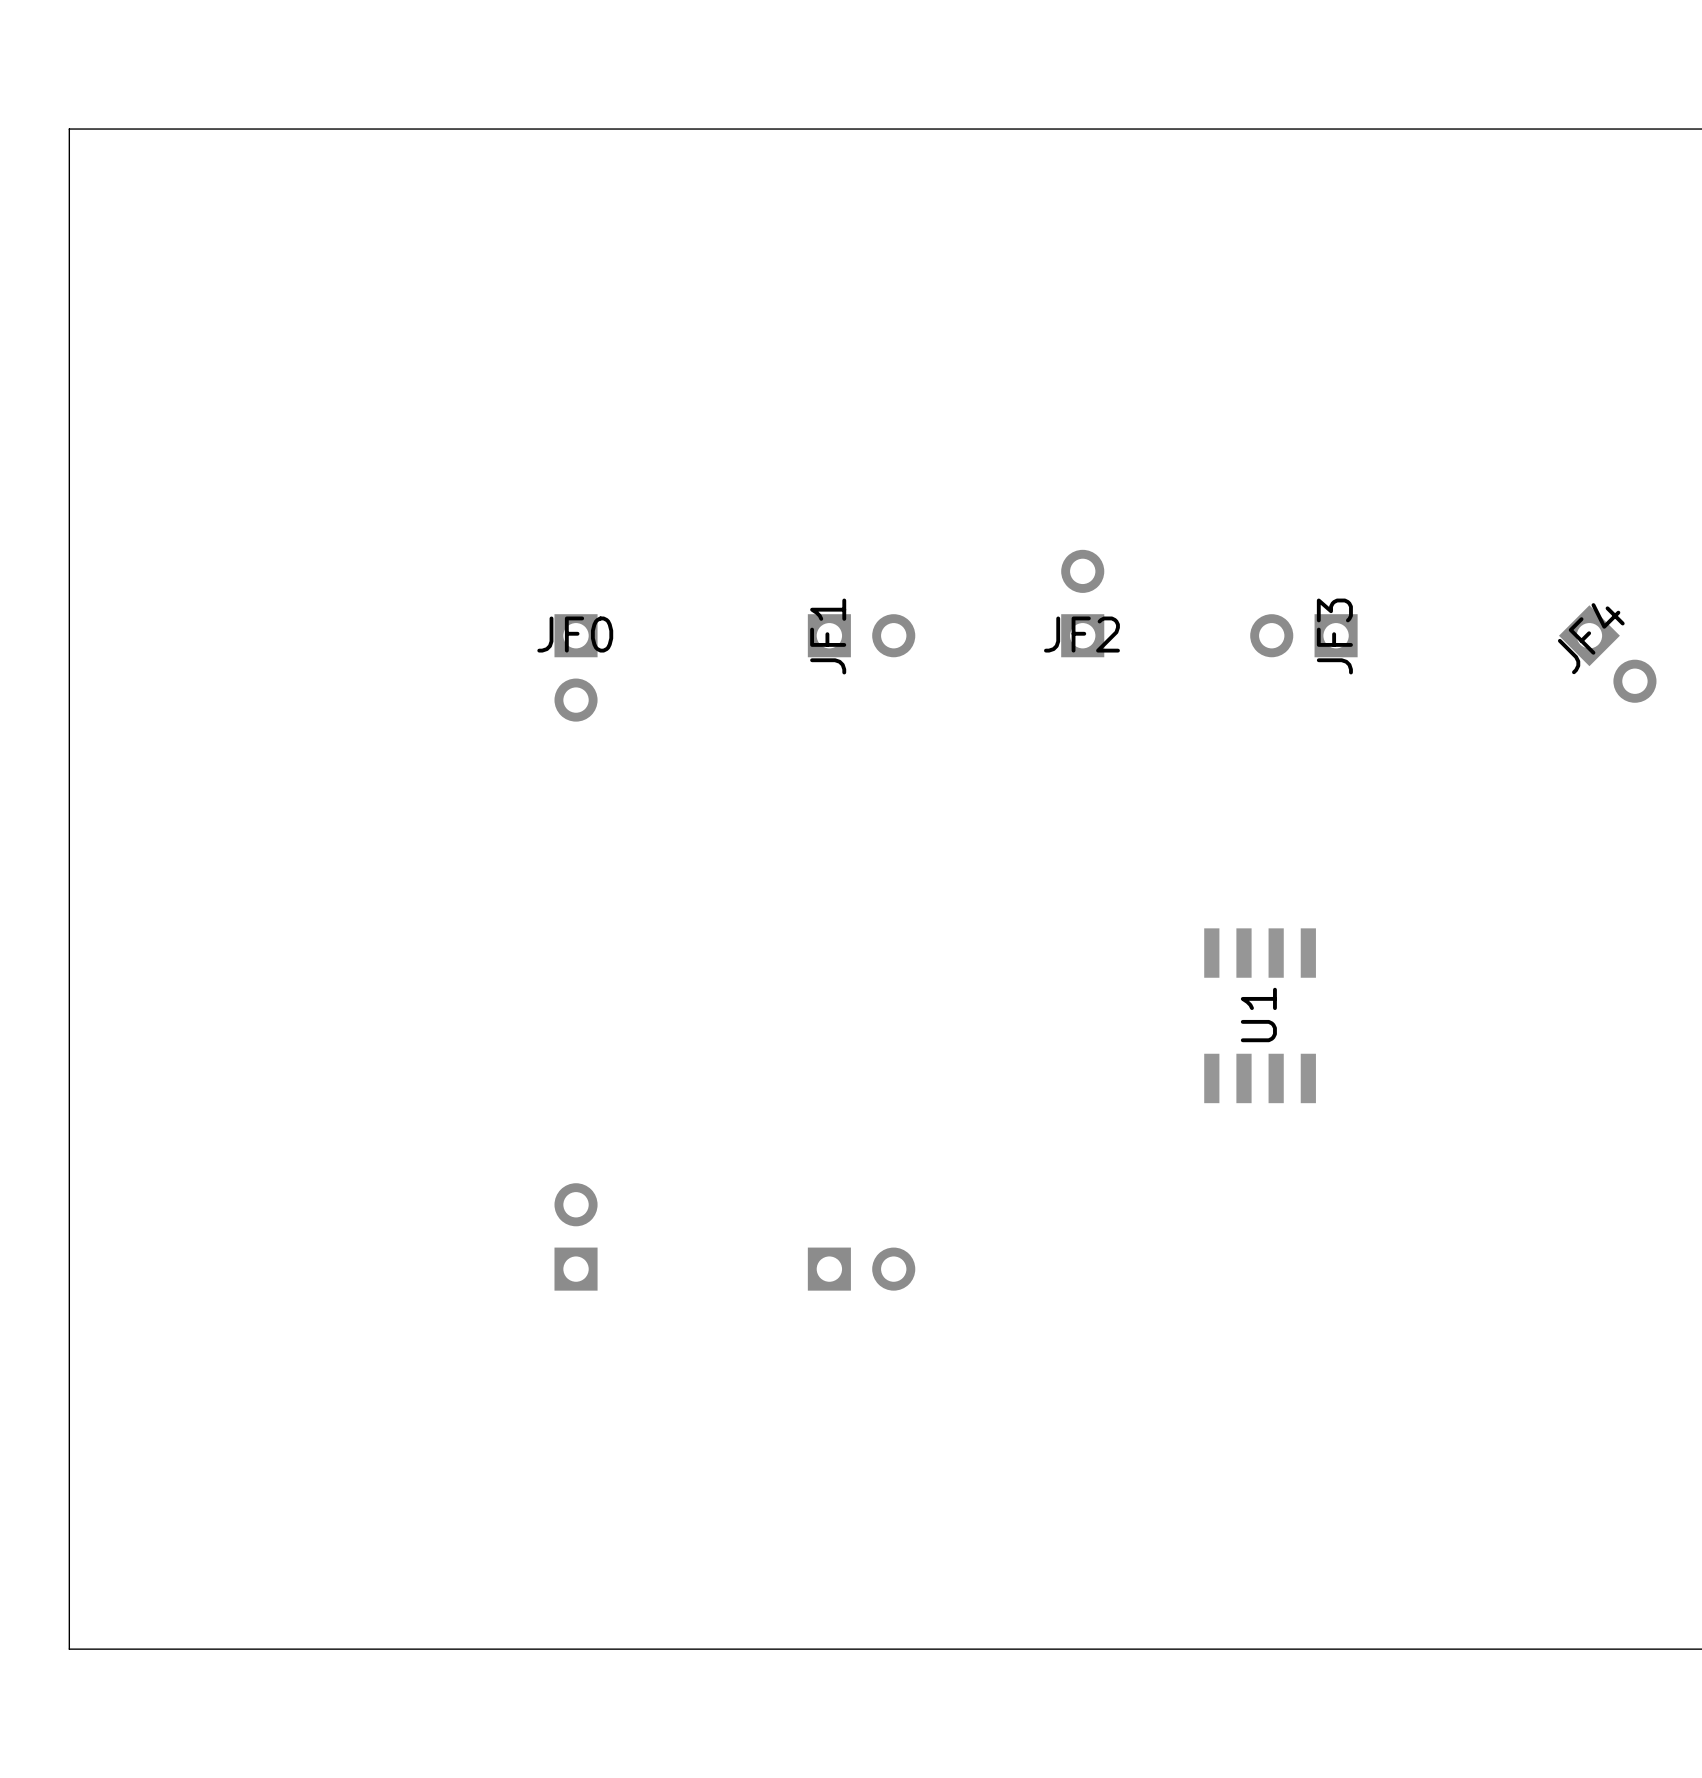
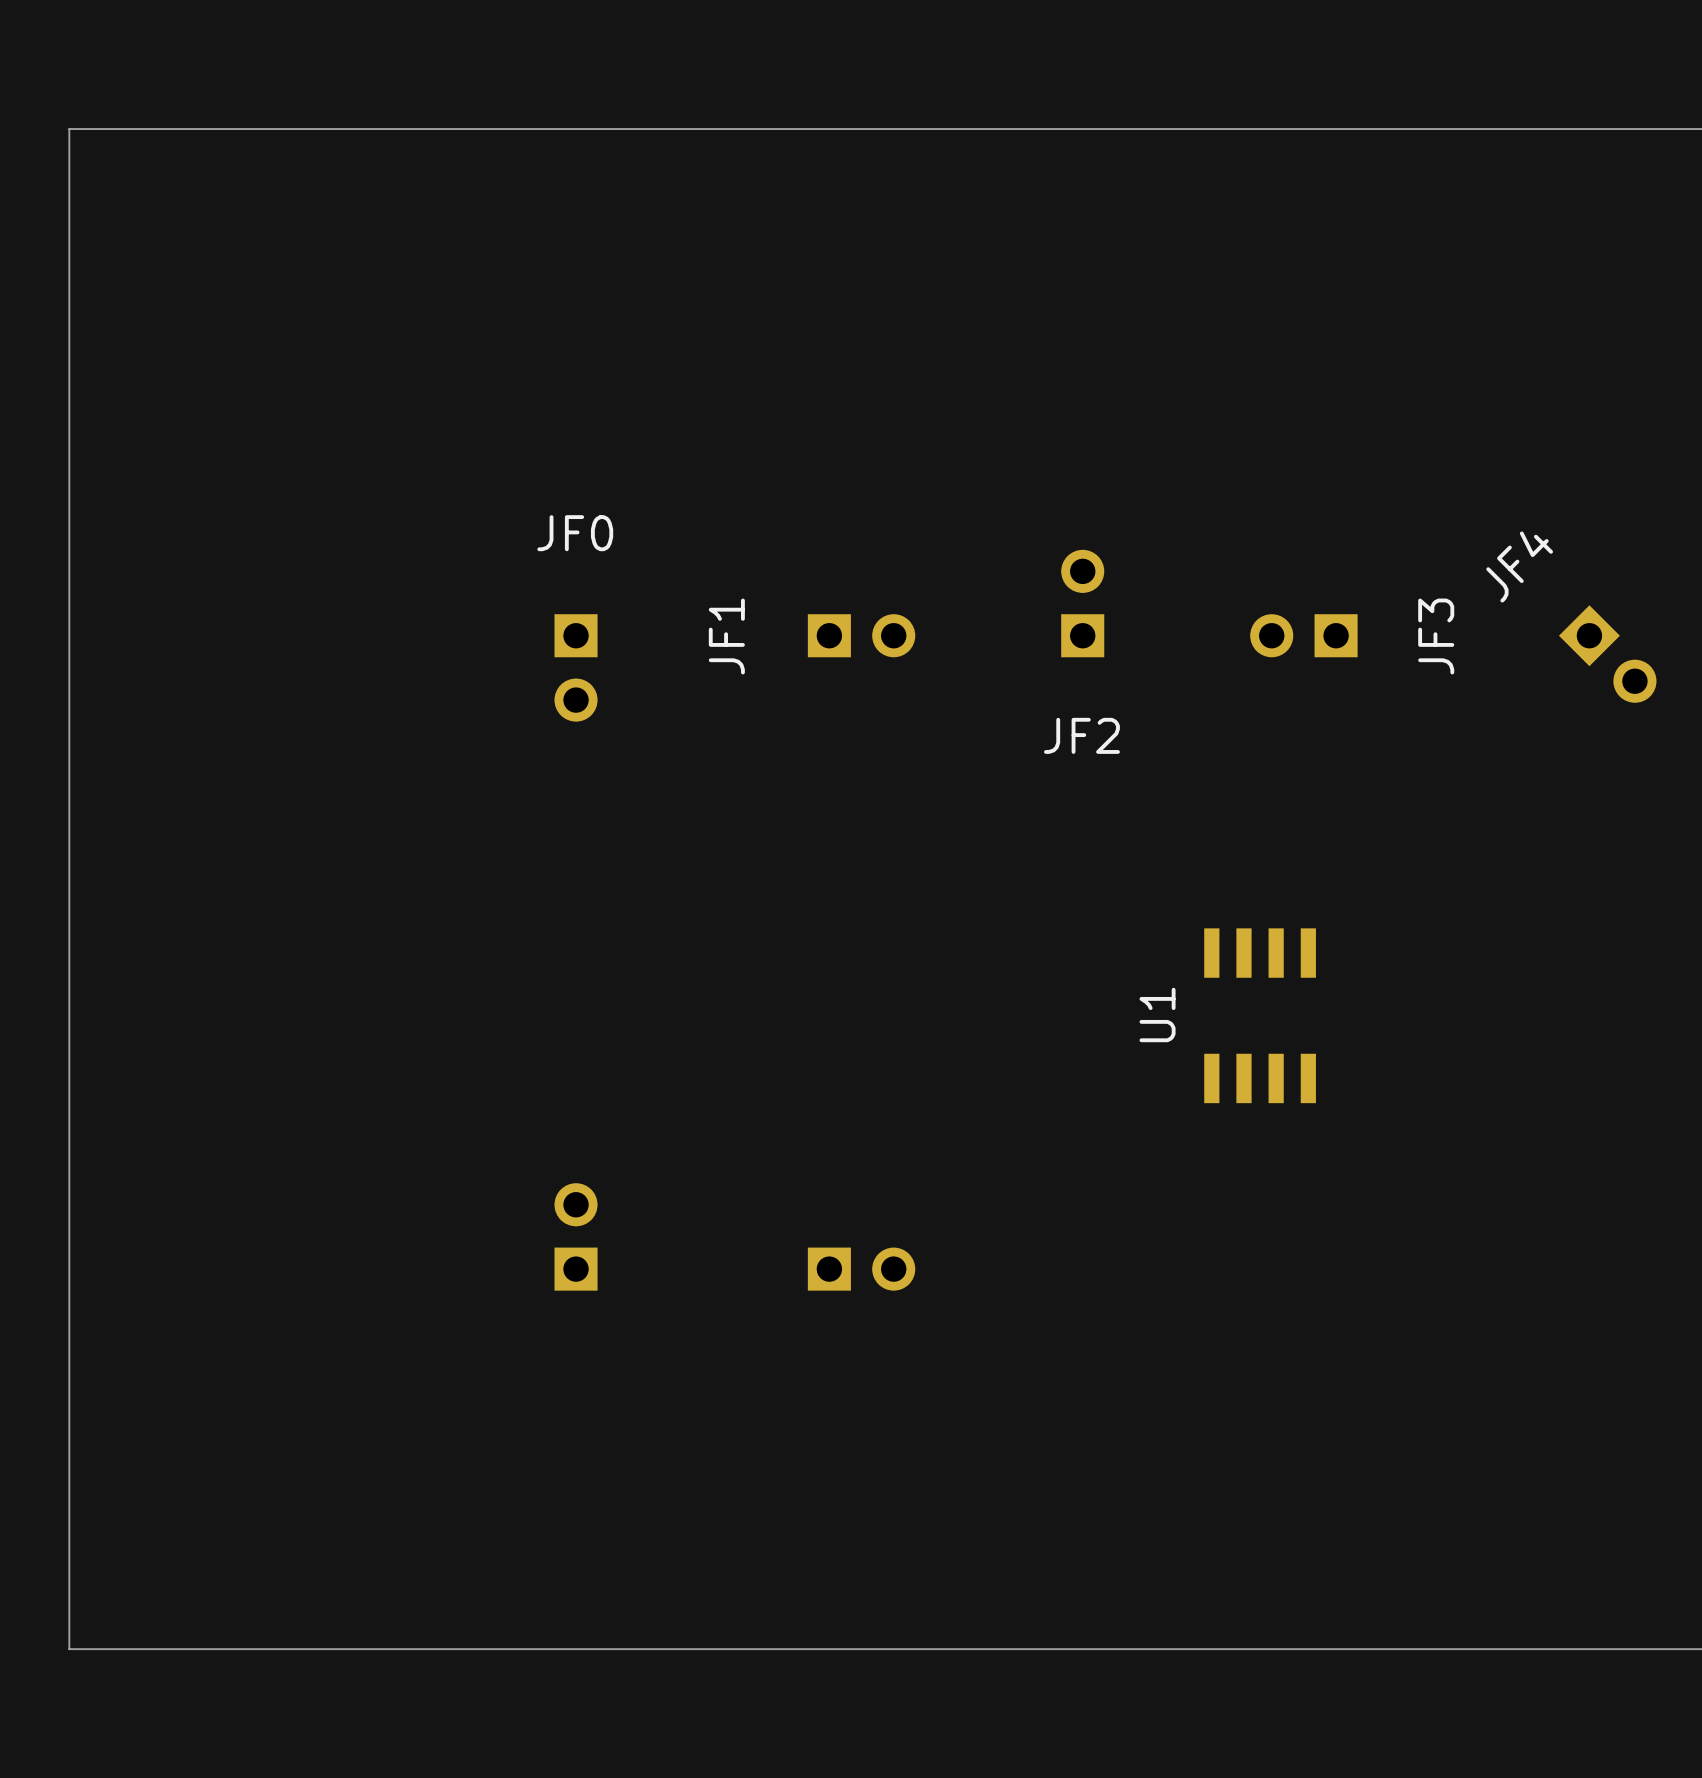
JF0 name position: JF0 (575, 634) -> JF0 (575, 533)
JF2 name position: JF2 (1081, 634) -> JF2 (1081, 735)
JF1 name position: JF1 (828, 636) -> JF1 (726, 636)
JF3 name position: JF3 (1334, 636) -> JF3 (1436, 636)
JF4 name position: JF4 (1591, 638) -> JF4 (1519, 567)
U1 name position: U1 (1258, 1014) -> U1 (1157, 1014)

